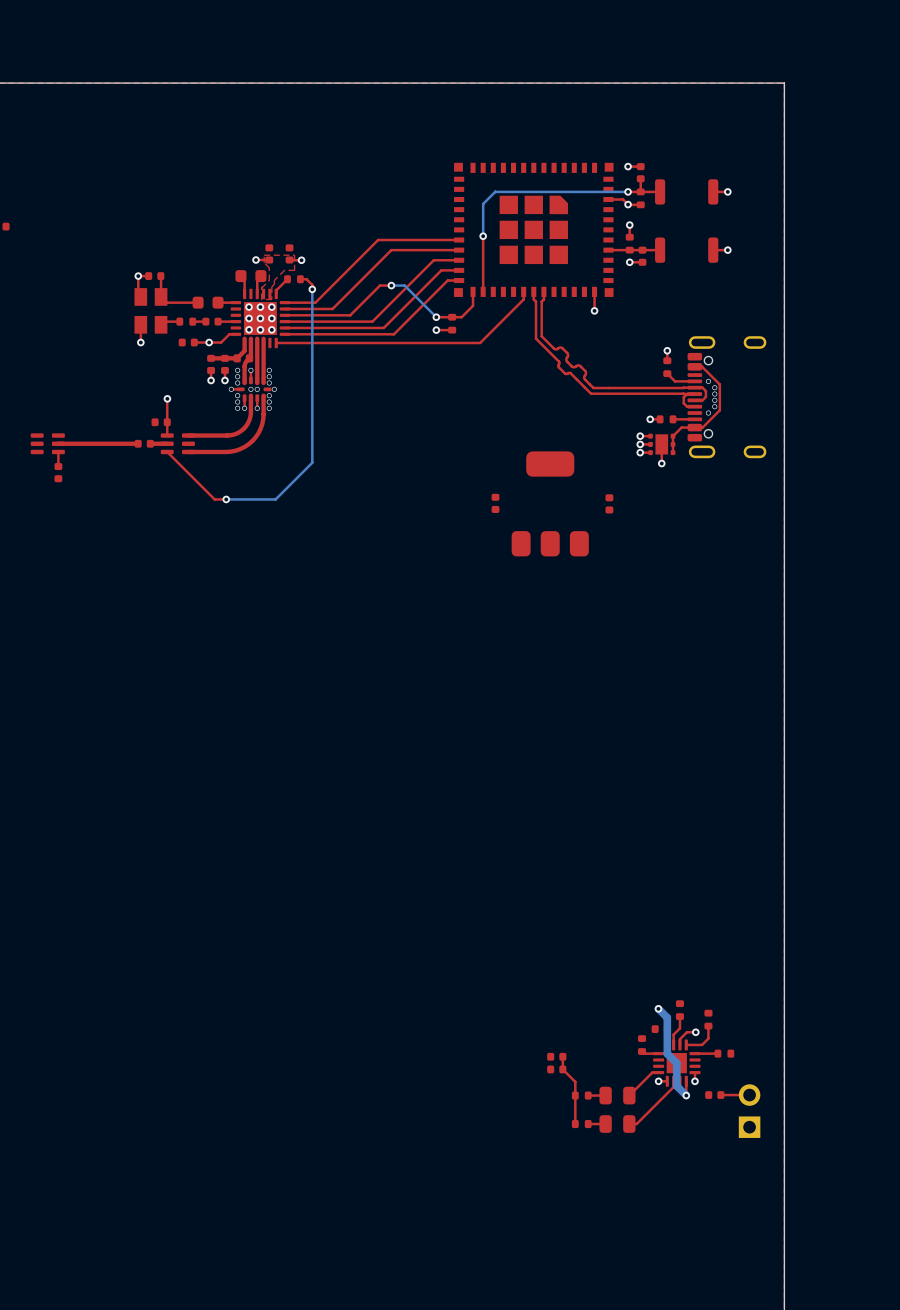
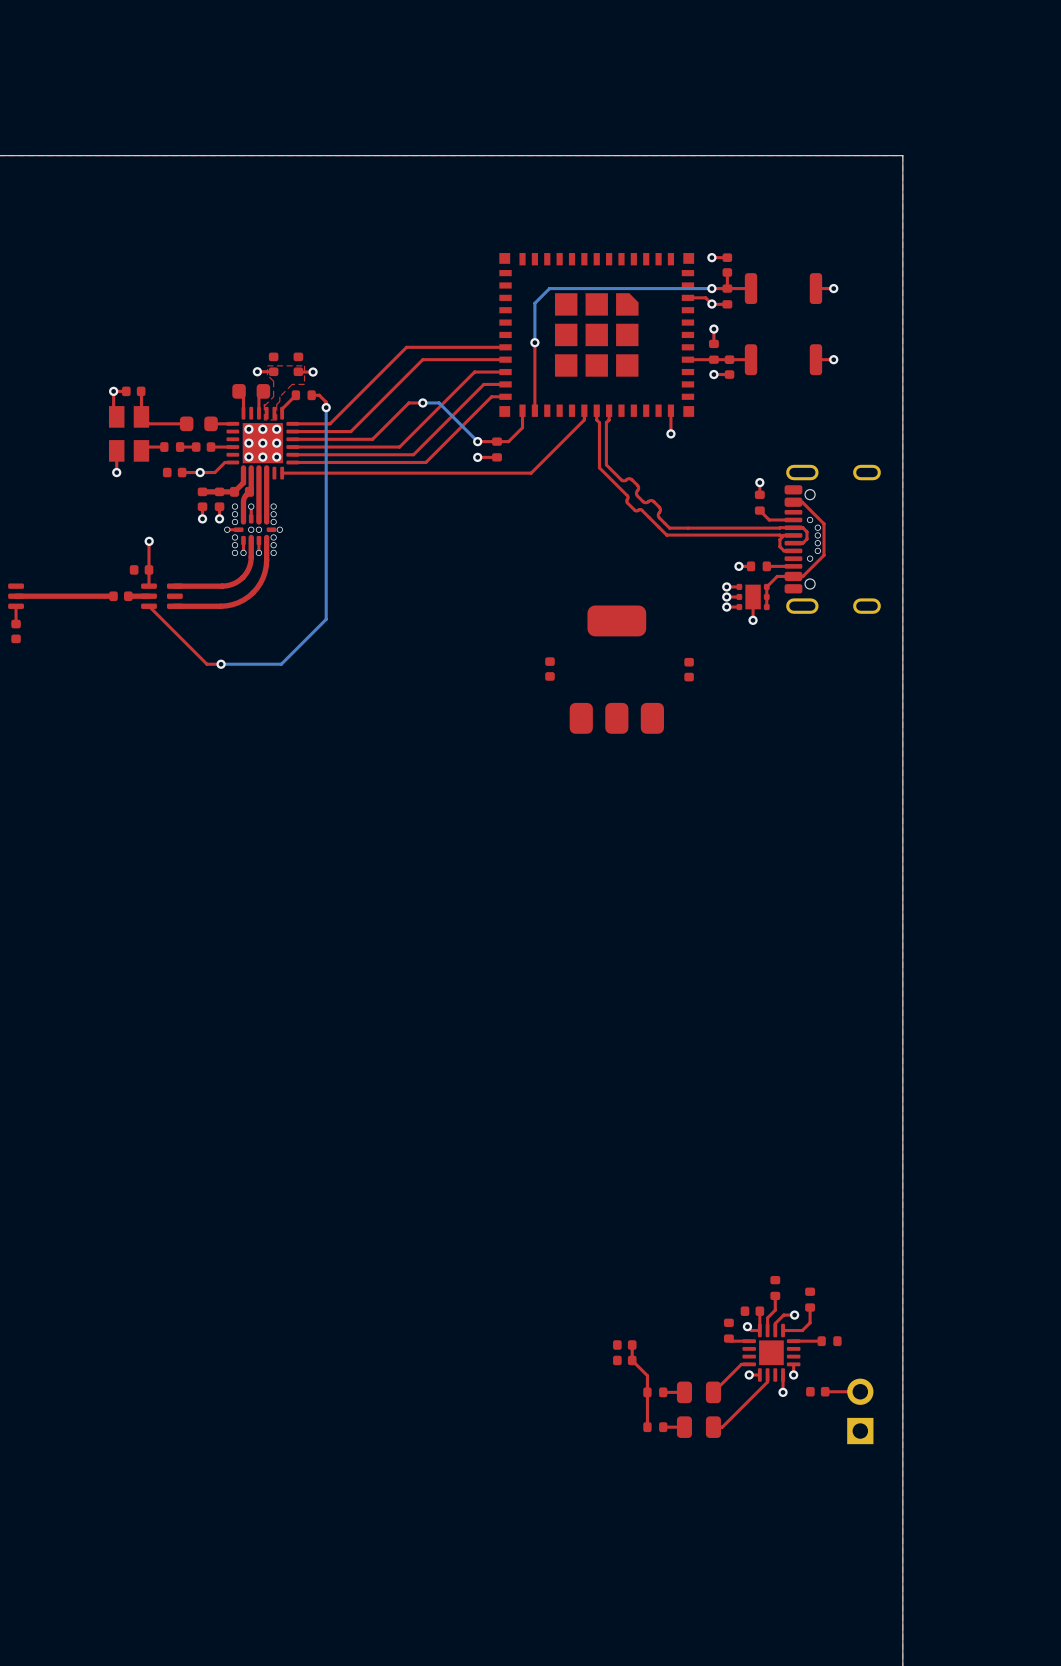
bottom track: (658, 1008) (667, 1017) (667, 1053) (676, 1063) (676, 1086) (686, 1095) -> none
via position: (658, 1008) -> (747, 1326)
top track: none -> (747, 1326) (751, 1330) (759, 1330)

